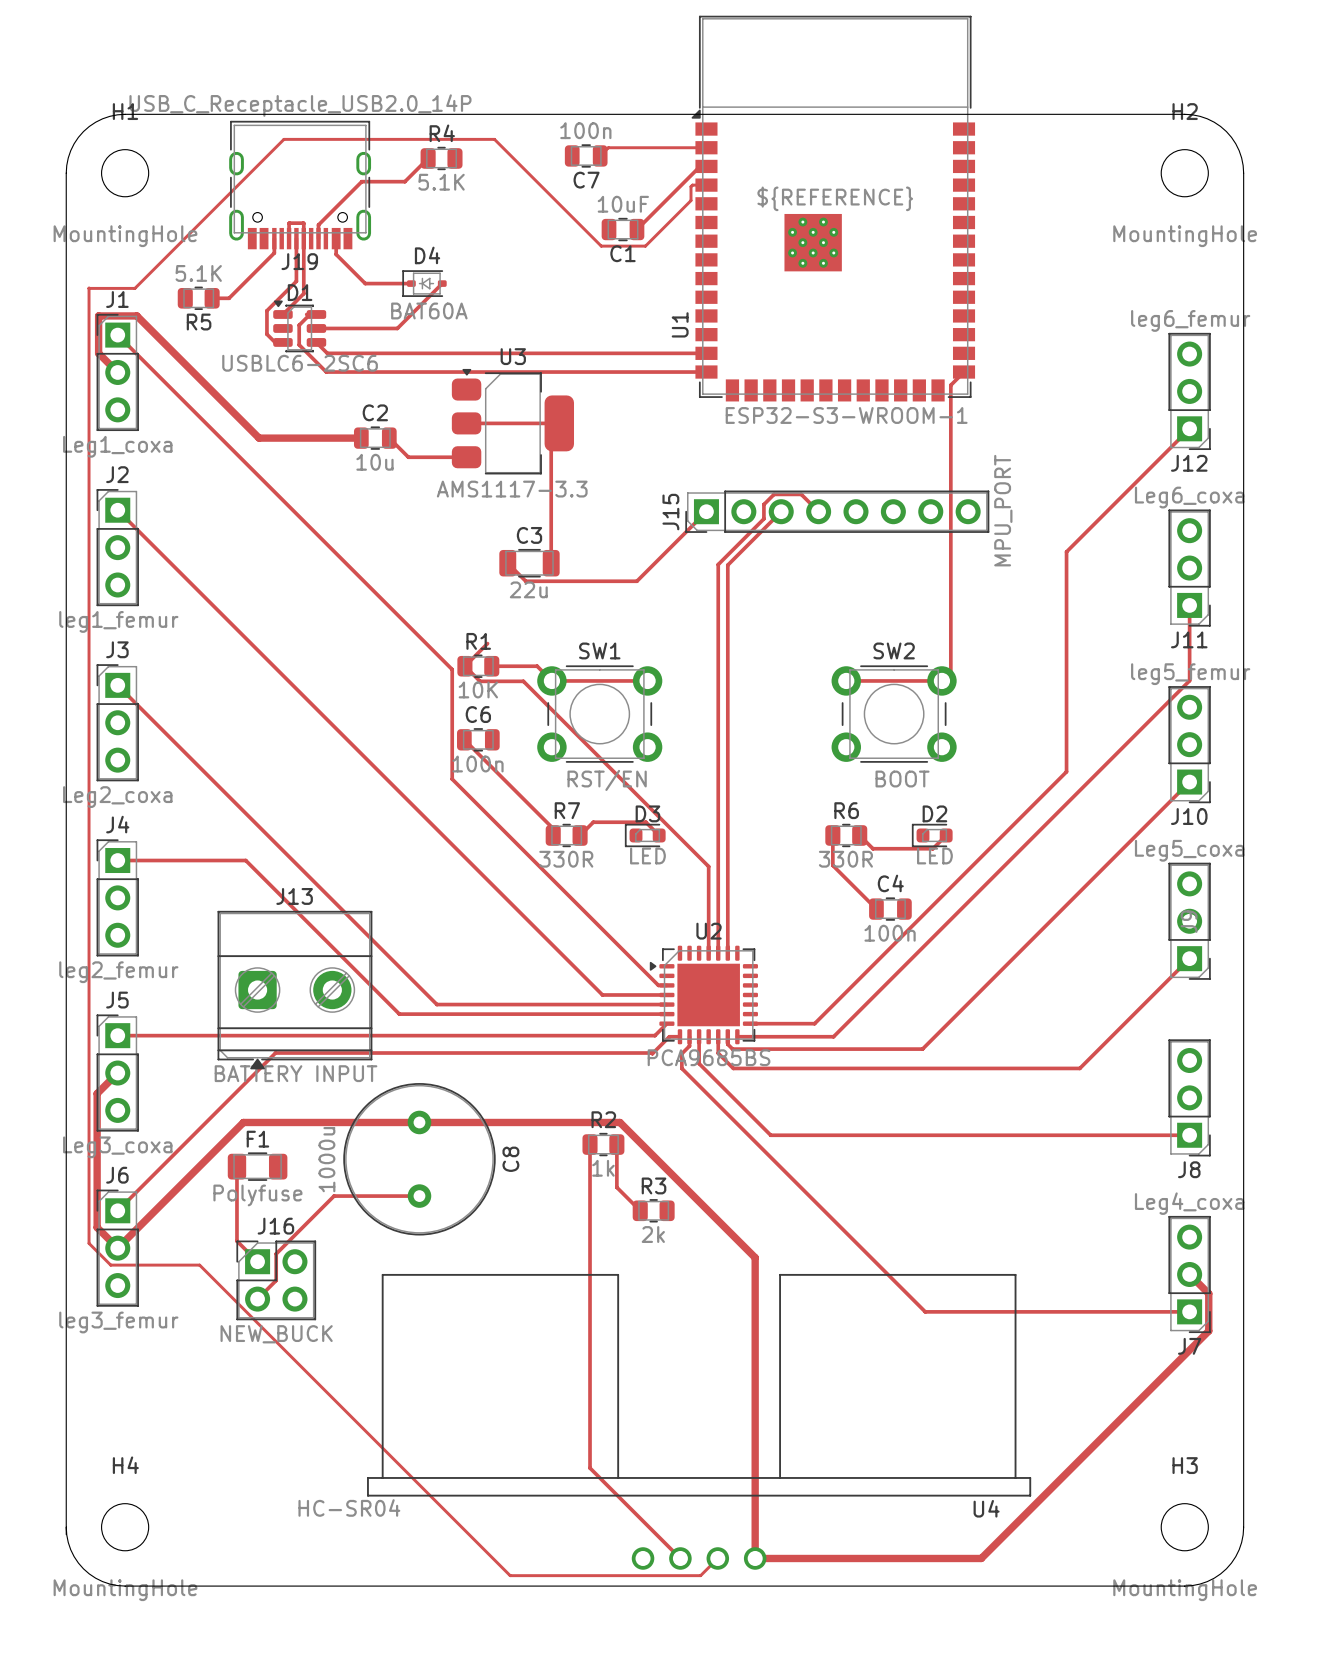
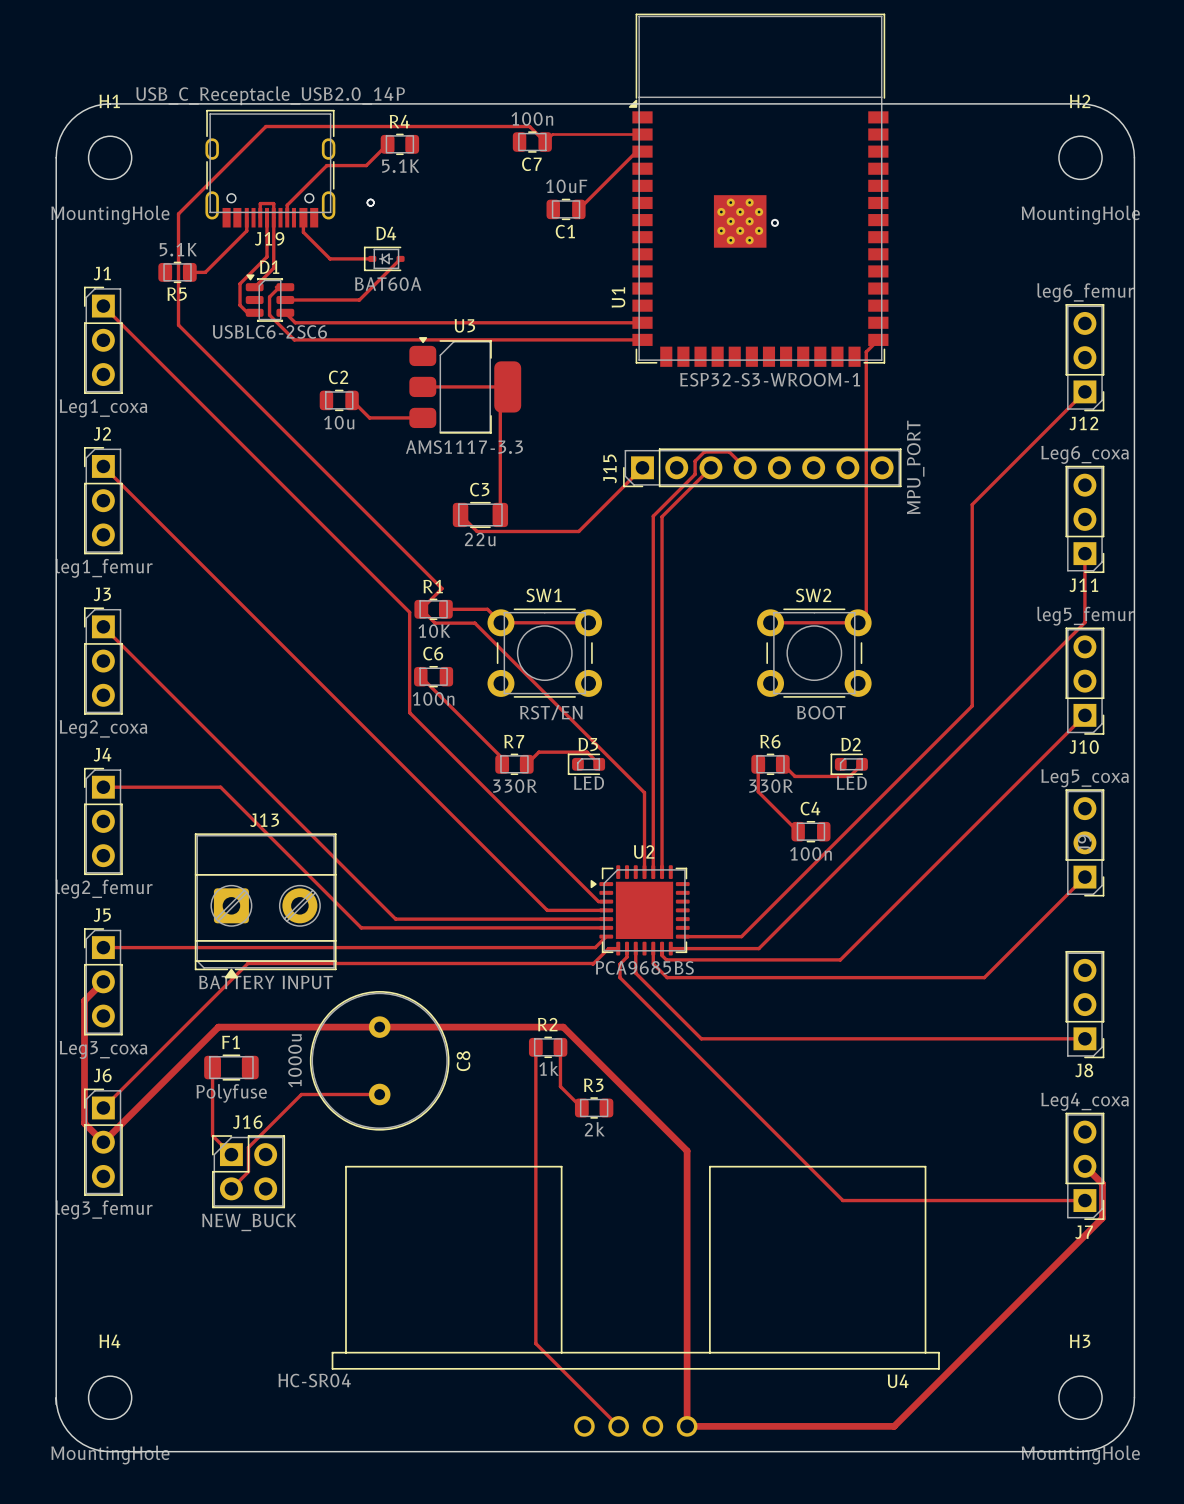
track: none -> (545, 142) (529, 126) (265, 126) (178, 213) (178, 325) (442, 588)
track: (698, 185) (690, 186) (690, 200) (645, 246) (601, 246) (494, 139) (283, 139) (134, 288) (89, 288) -> none
text: ${REFERENCE} (835, 198) -> none
via: none -> (370, 202)
via: none -> (774, 222)
track: (89, 287) (89, 1243) (110, 1265) (199, 1265) (510, 1575) (700, 1575) (717, 1558) -> none
track: (117, 372) (98, 353) (98, 315) (136, 315) (259, 438) (361, 438) -> none

